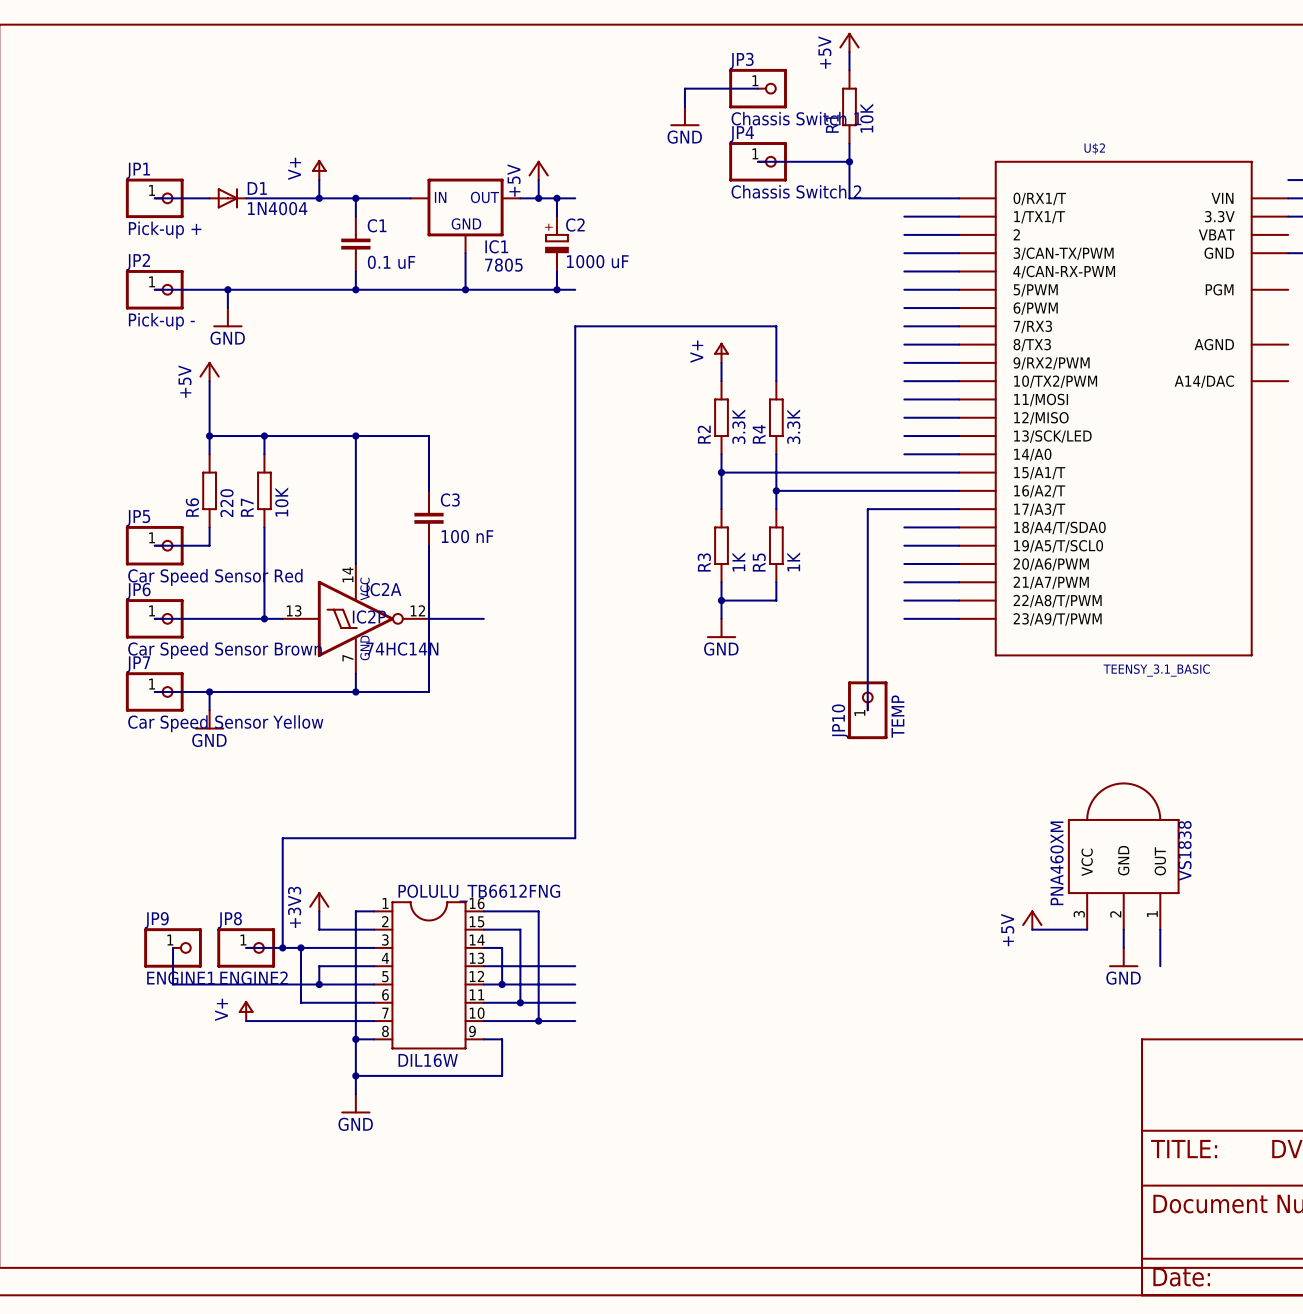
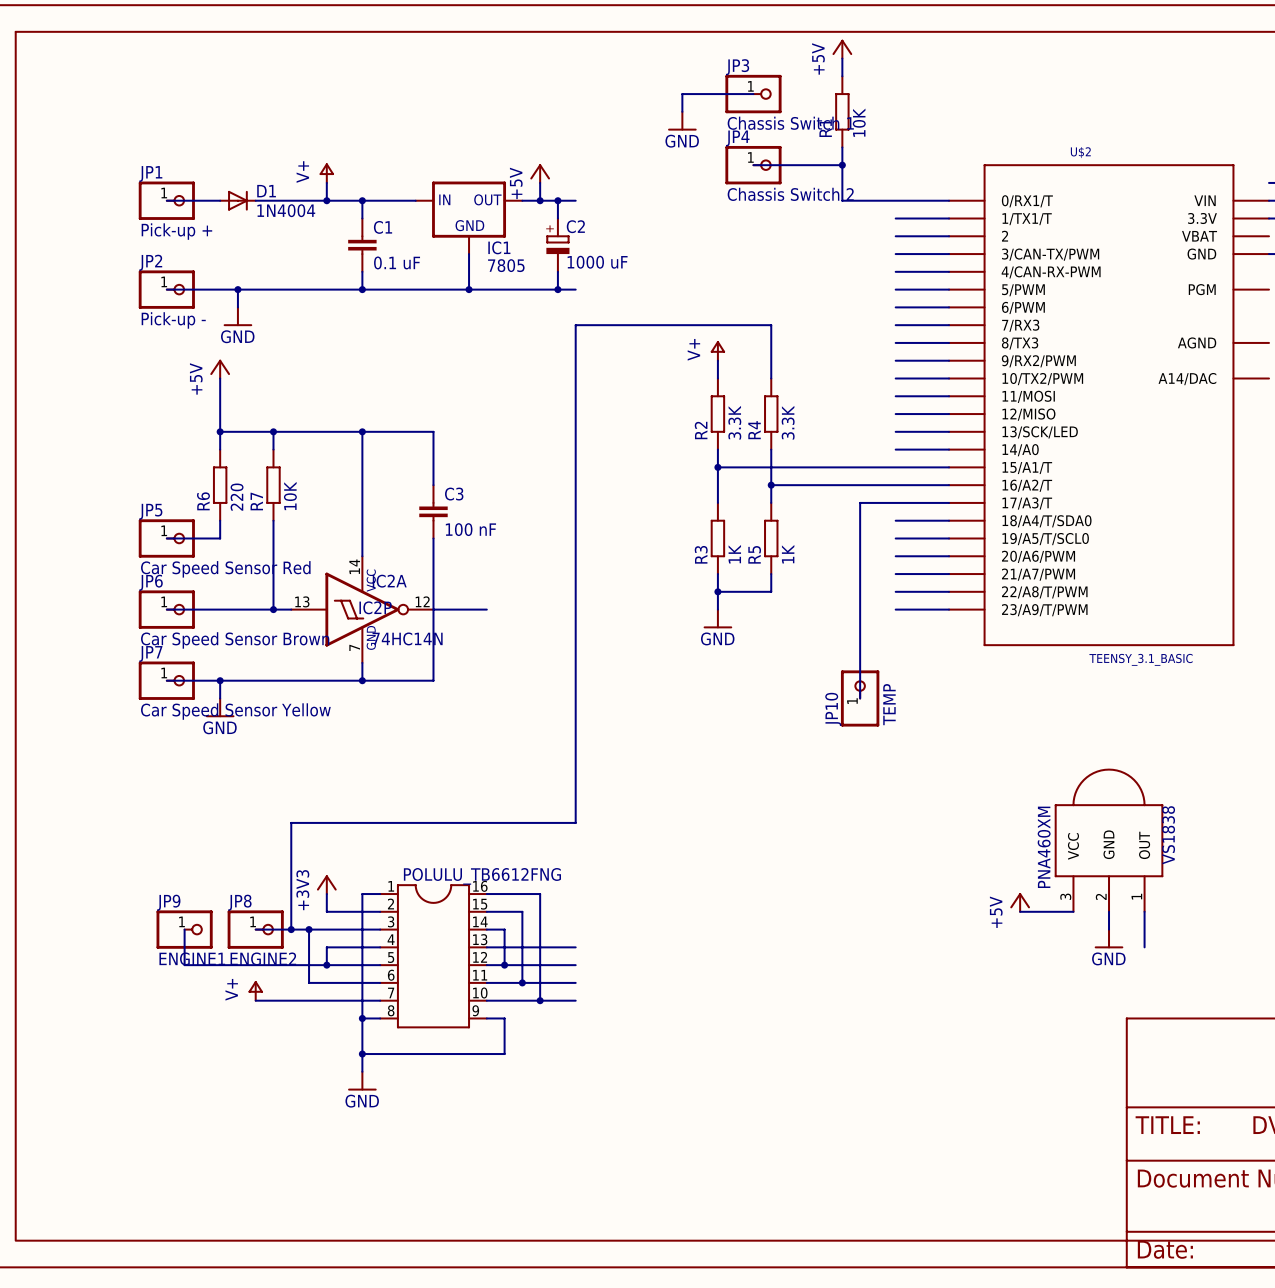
POLULU_TB6612FNG value: DIL16W (428, 1060) -> none

